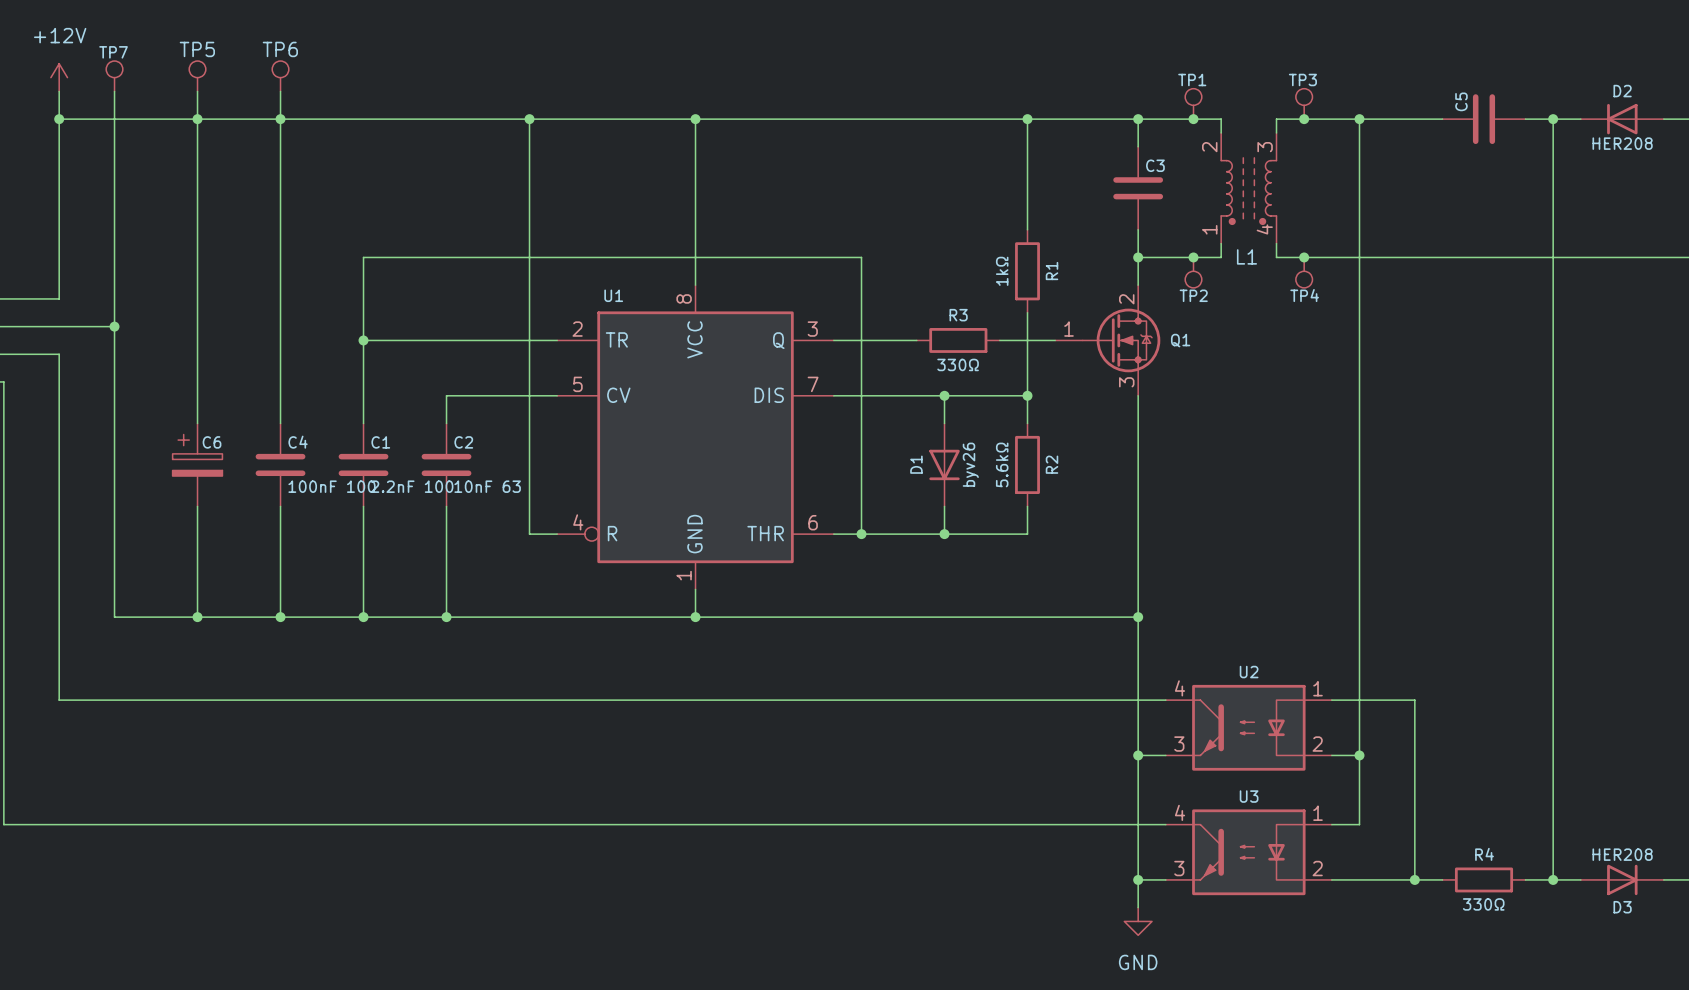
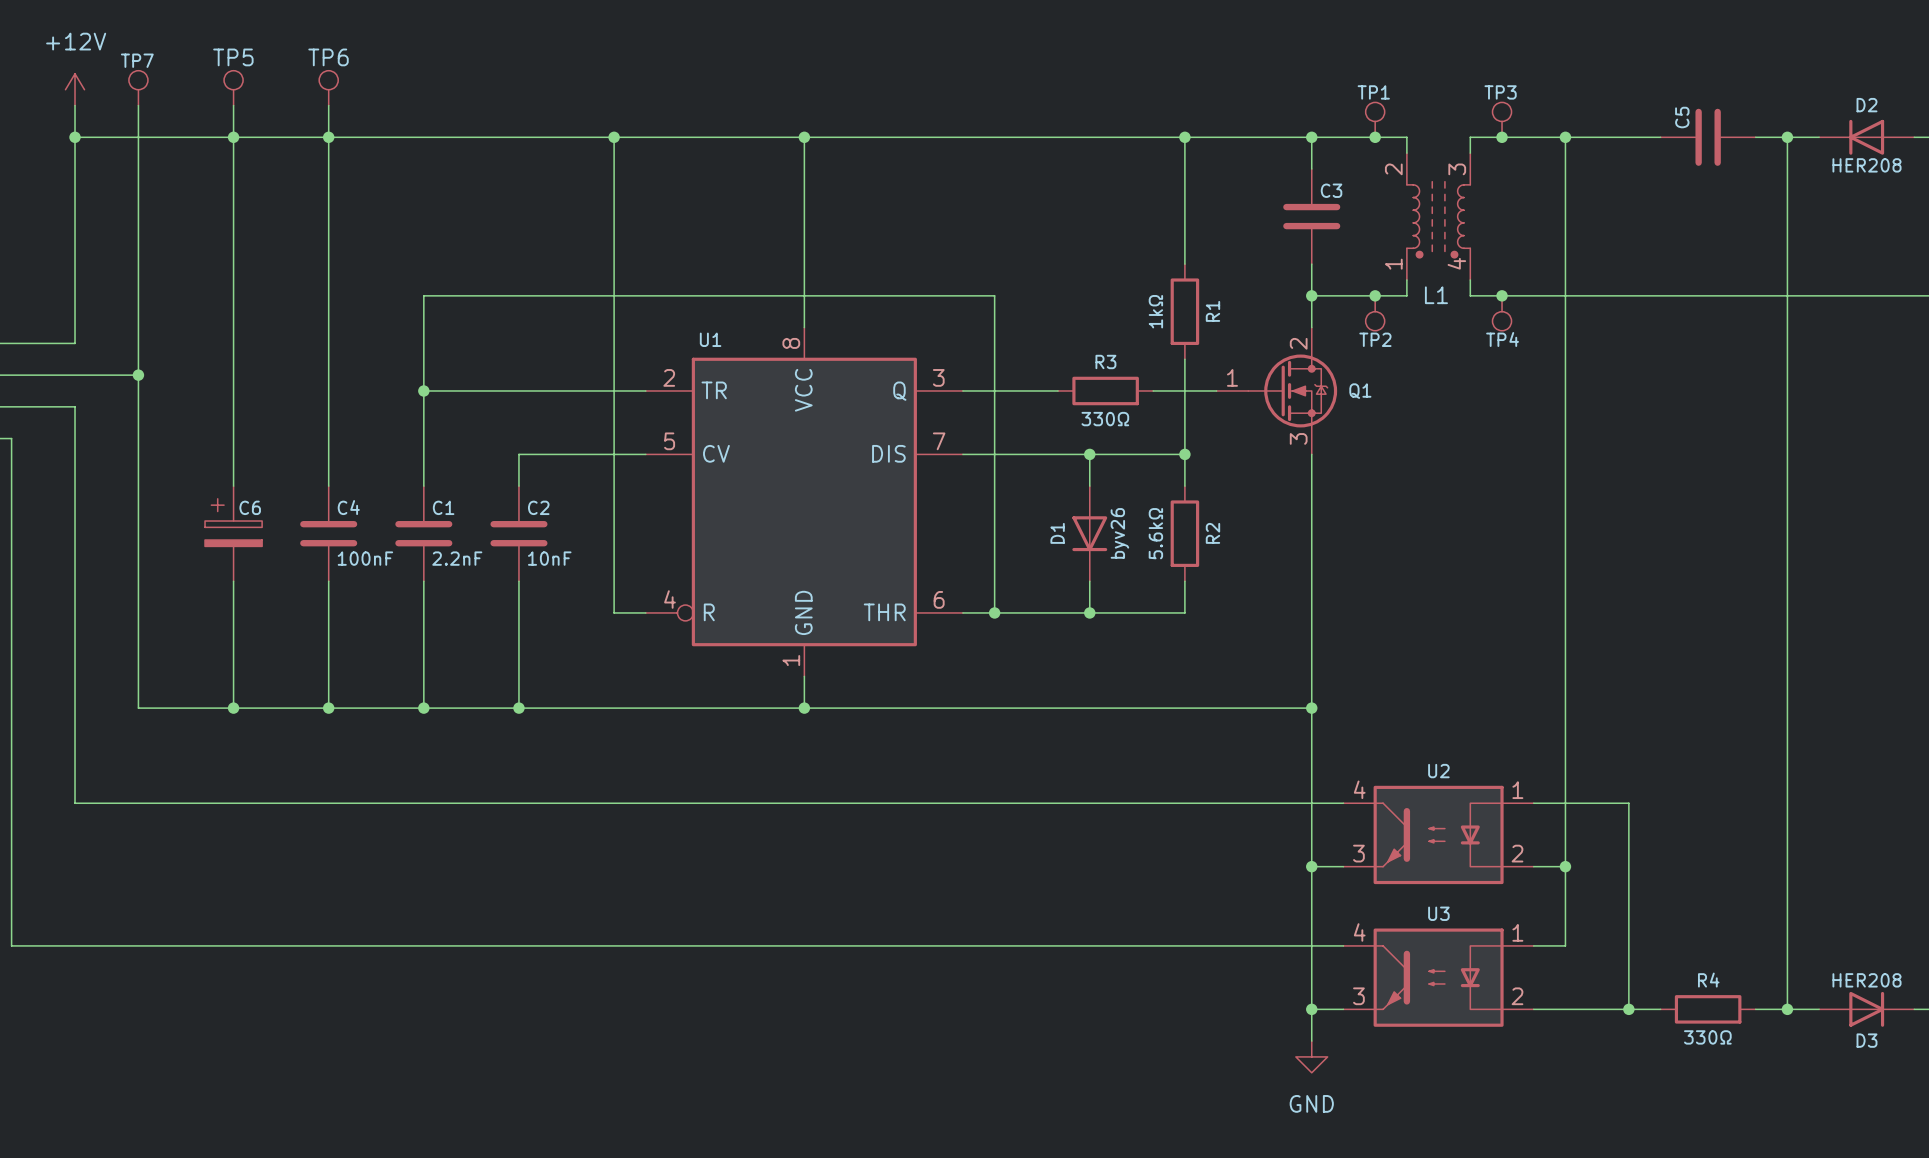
C4 value: 100nF 100 (332, 486) -> 100nF (365, 558)
C1 value: 2.2nF 100 (412, 486) -> 2.2nF (457, 558)
C2 value: 10nF 63 (487, 486) -> 10nF (549, 558)

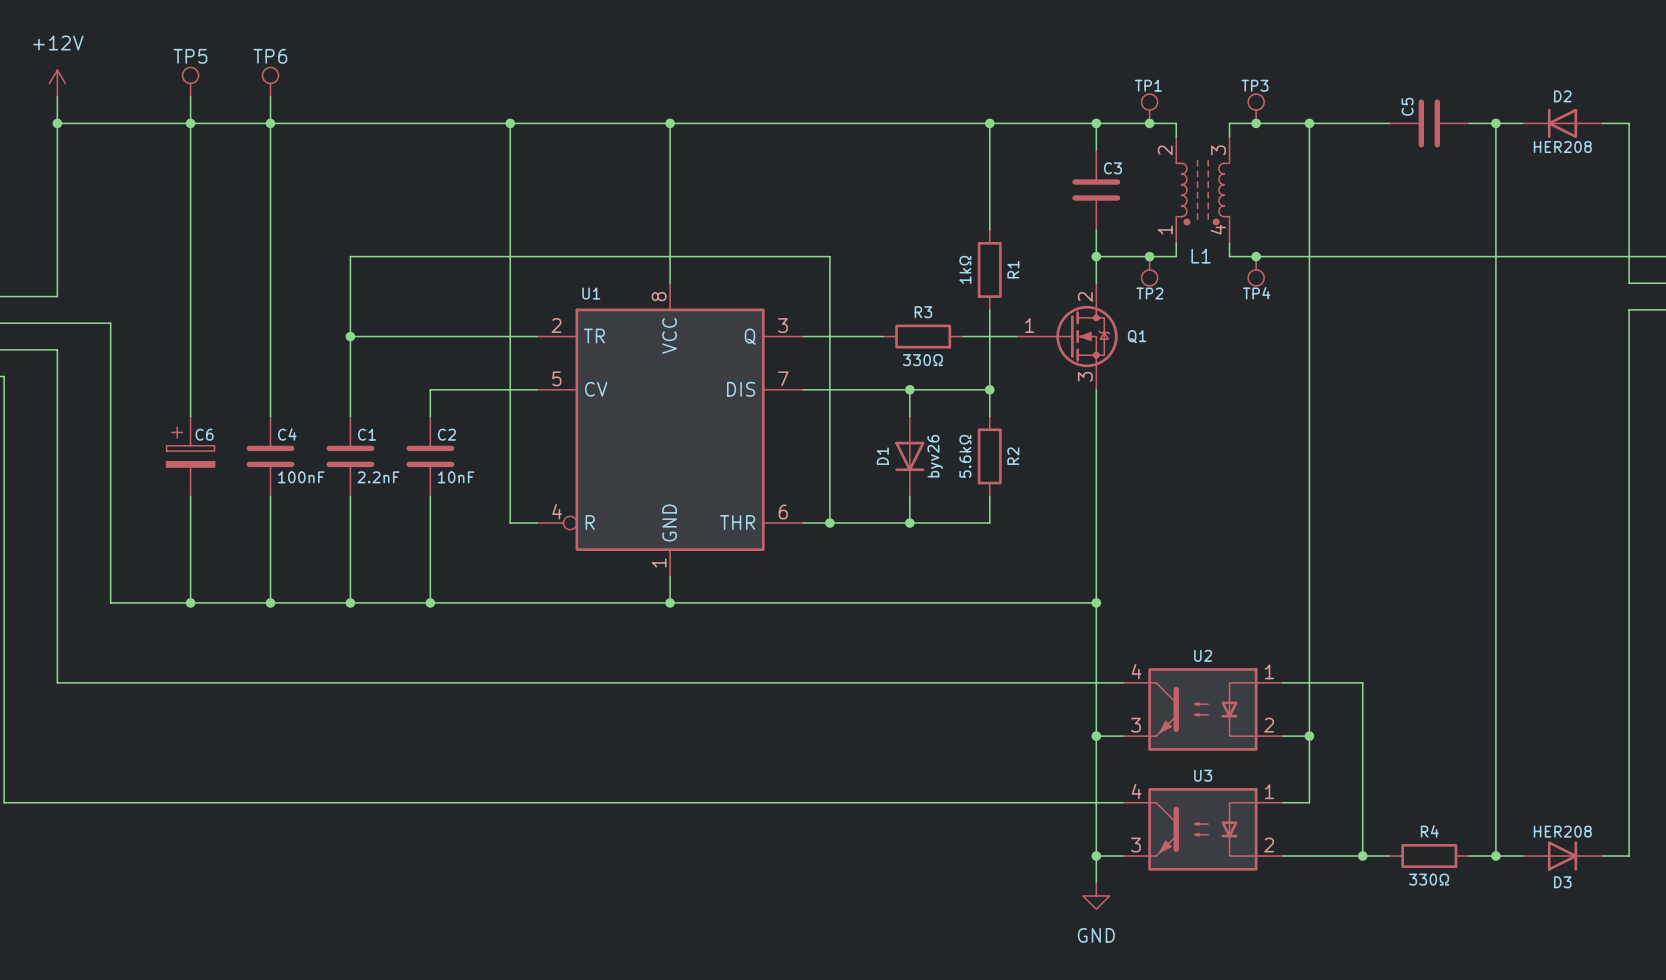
TP7: (138, 88) -> none
wire: (138, 105) (138, 375) -> none
junction: (138, 375) -> none

